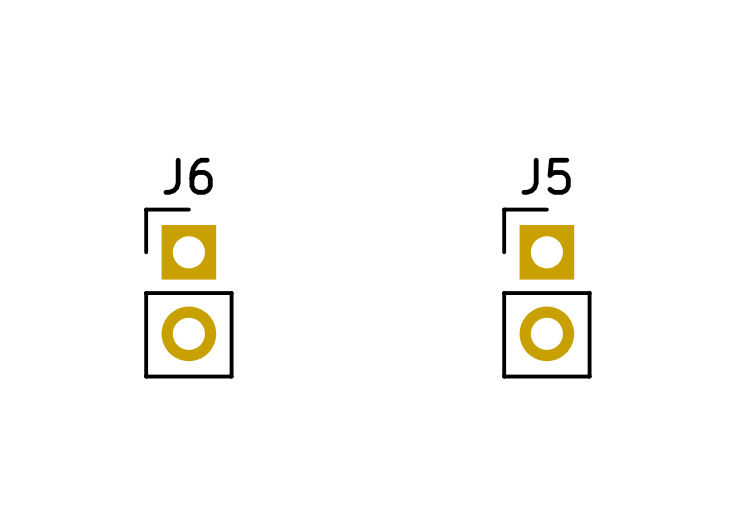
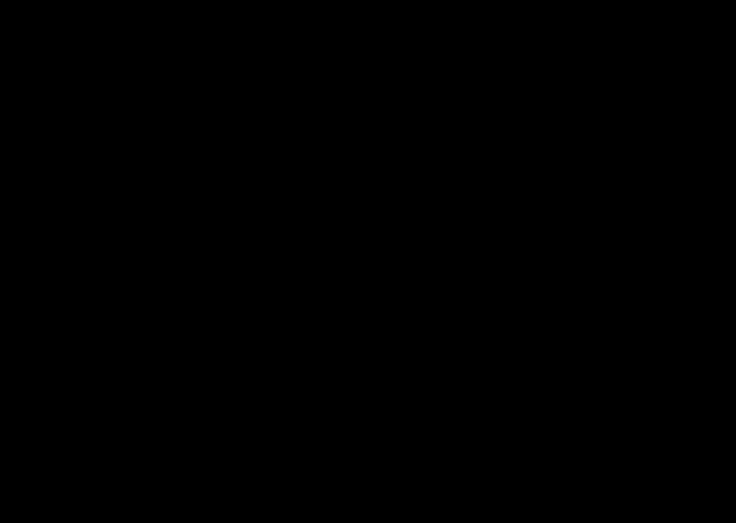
J6: (188, 293) -> none
J5: (546, 293) -> none

